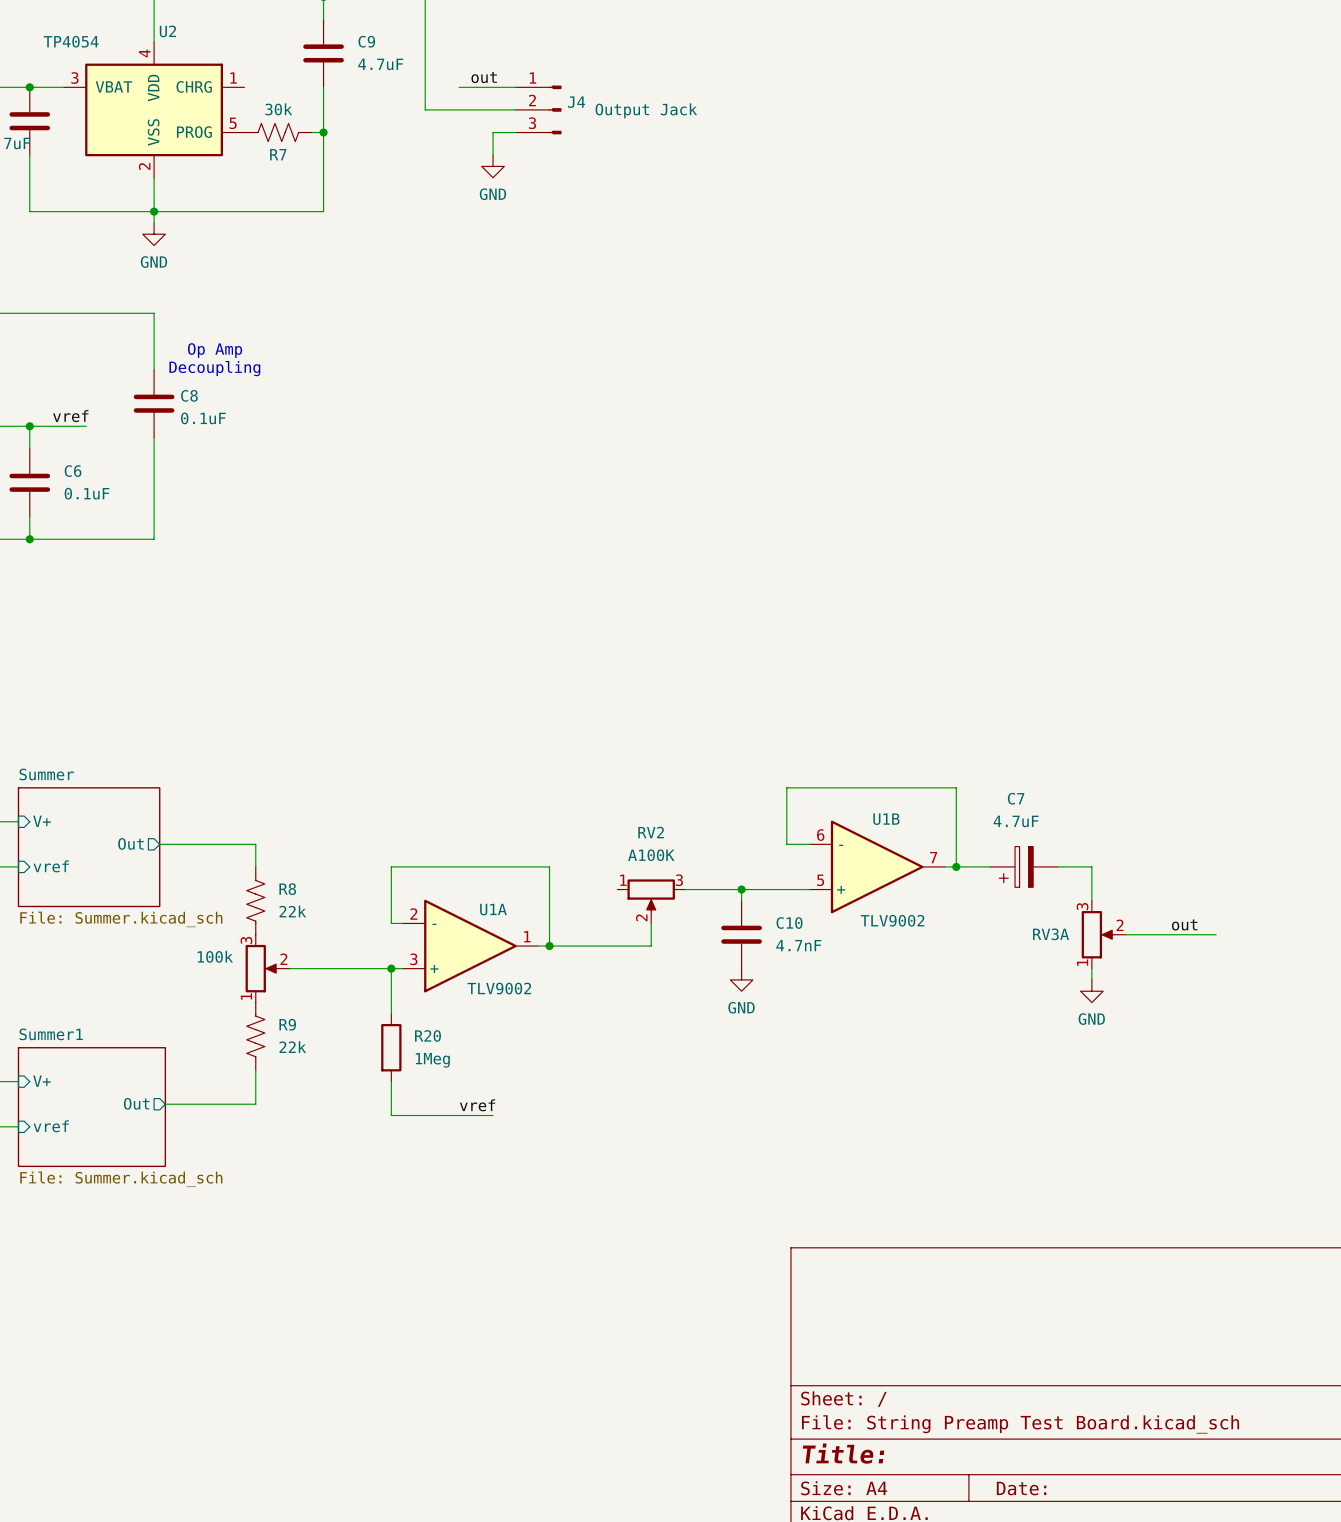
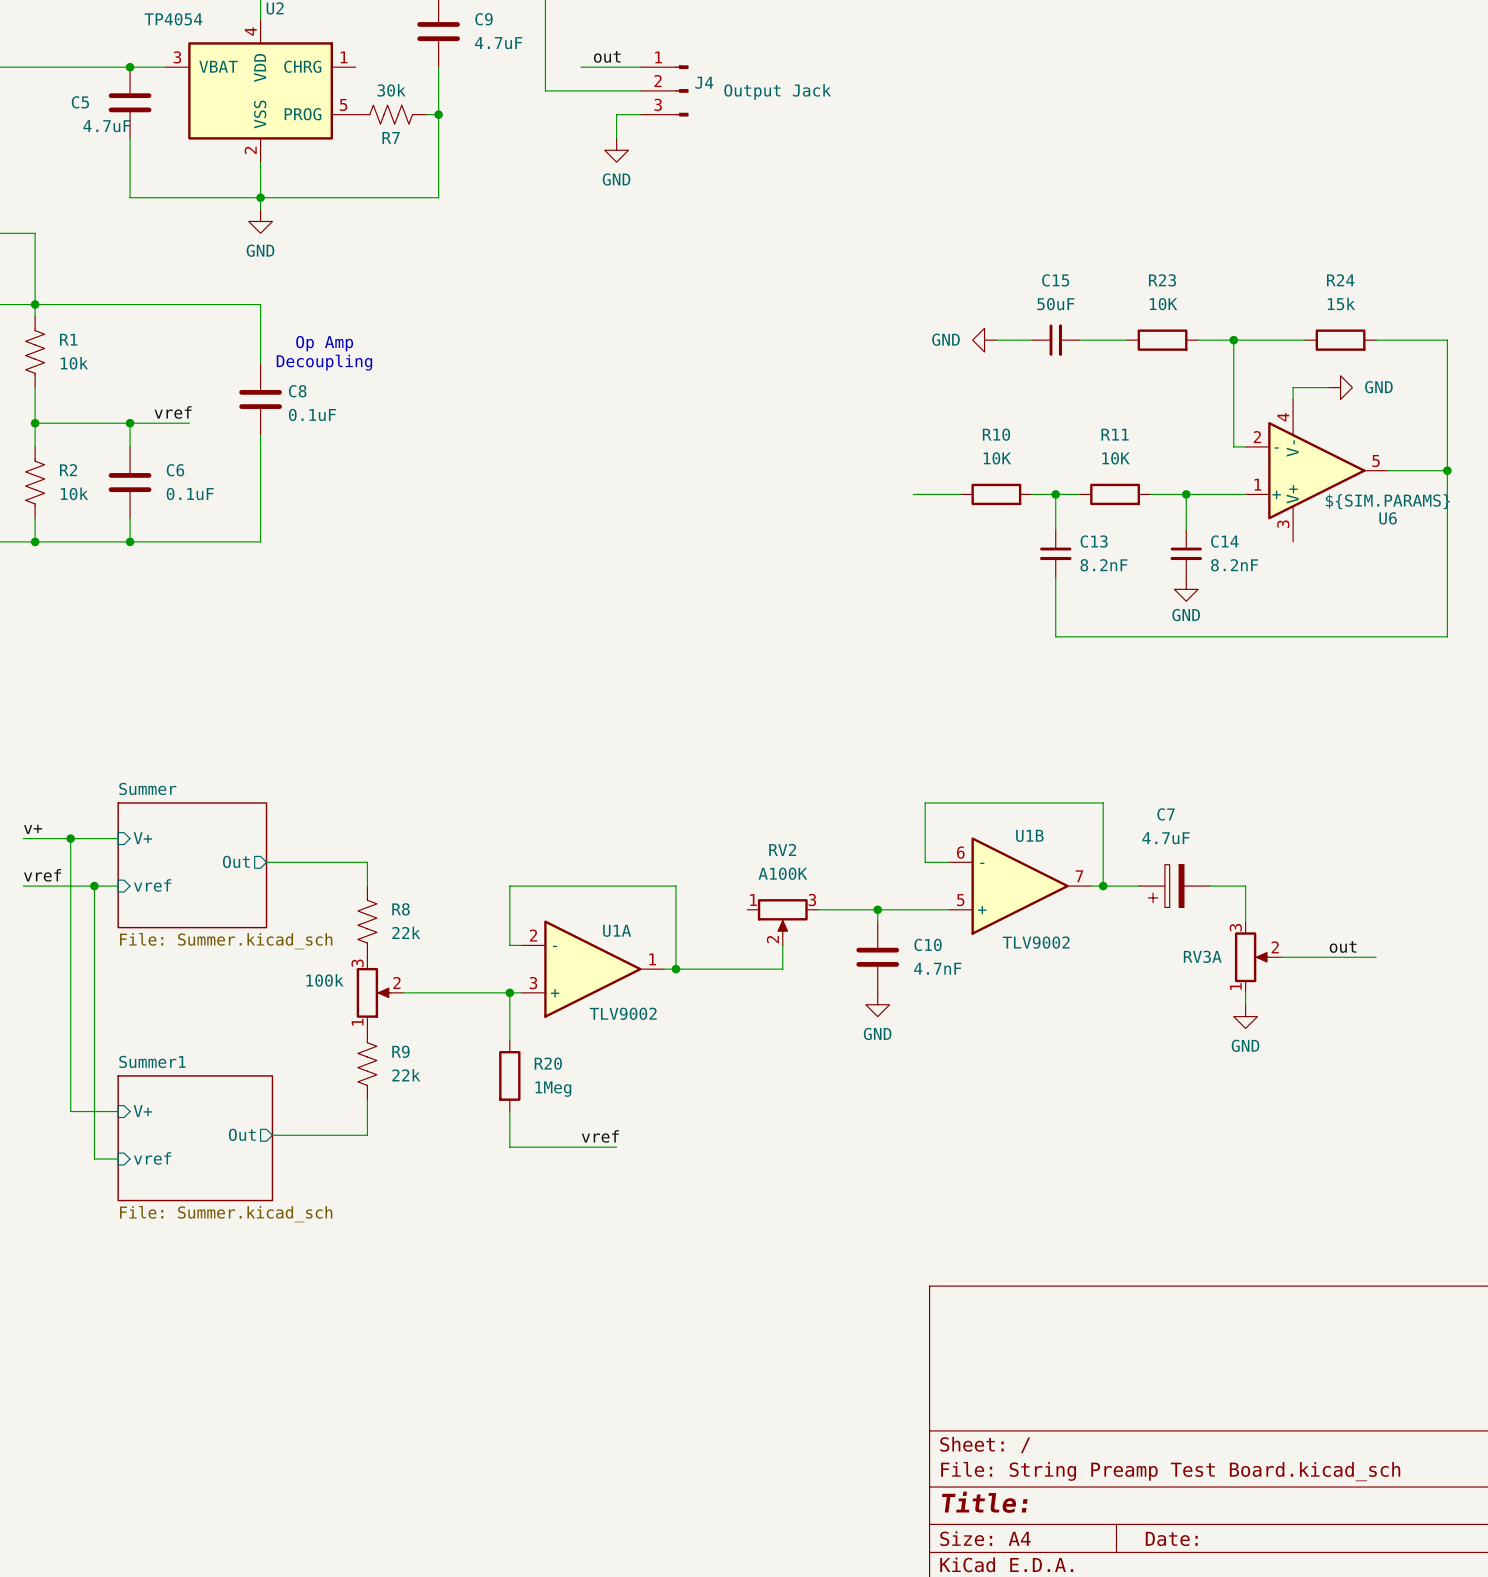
power symbol: none -> GND (984, 340)
wire: none -> (996, 340) (1031, 340)
C15: none -> 50uF (1055, 340)
wire: none -> (1079, 340) (1126, 340)
R23: none -> 10K (1162, 340)
wire: none -> (1198, 340) (1304, 340)
wire: none -> (1233, 340) (1233, 446) (1245, 446)
junction: none -> (1233, 340)
R24: none -> 15k (1340, 340)
wire: none -> (1376, 340) (1447, 340) (1447, 636) (1055, 636) (1055, 577)
wire: none -> (1328, 387) (1293, 387) (1293, 399)
power symbol: none -> GND (1340, 387)
U6: none -> ${SIM.PARAMS} (1316, 470)
wire: none -> (1388, 470) (1447, 470)
junction: none -> (1447, 470)
wire: none -> (913, 494) (960, 494)
R10: none -> 10K (996, 494)
wire: none -> (1031, 494) (1079, 494)
wire: none -> (1055, 494) (1055, 530)
junction: none -> (1055, 494)
R11: none -> 10K (1115, 494)
wire: none -> (1150, 494) (1245, 494)
wire: none -> (1186, 494) (1186, 530)
junction: none -> (1186, 494)
C13: none -> 8.2nF (1055, 553)
C14: none -> 8.2nF (1186, 553)
power symbol: none -> GND (1186, 589)

